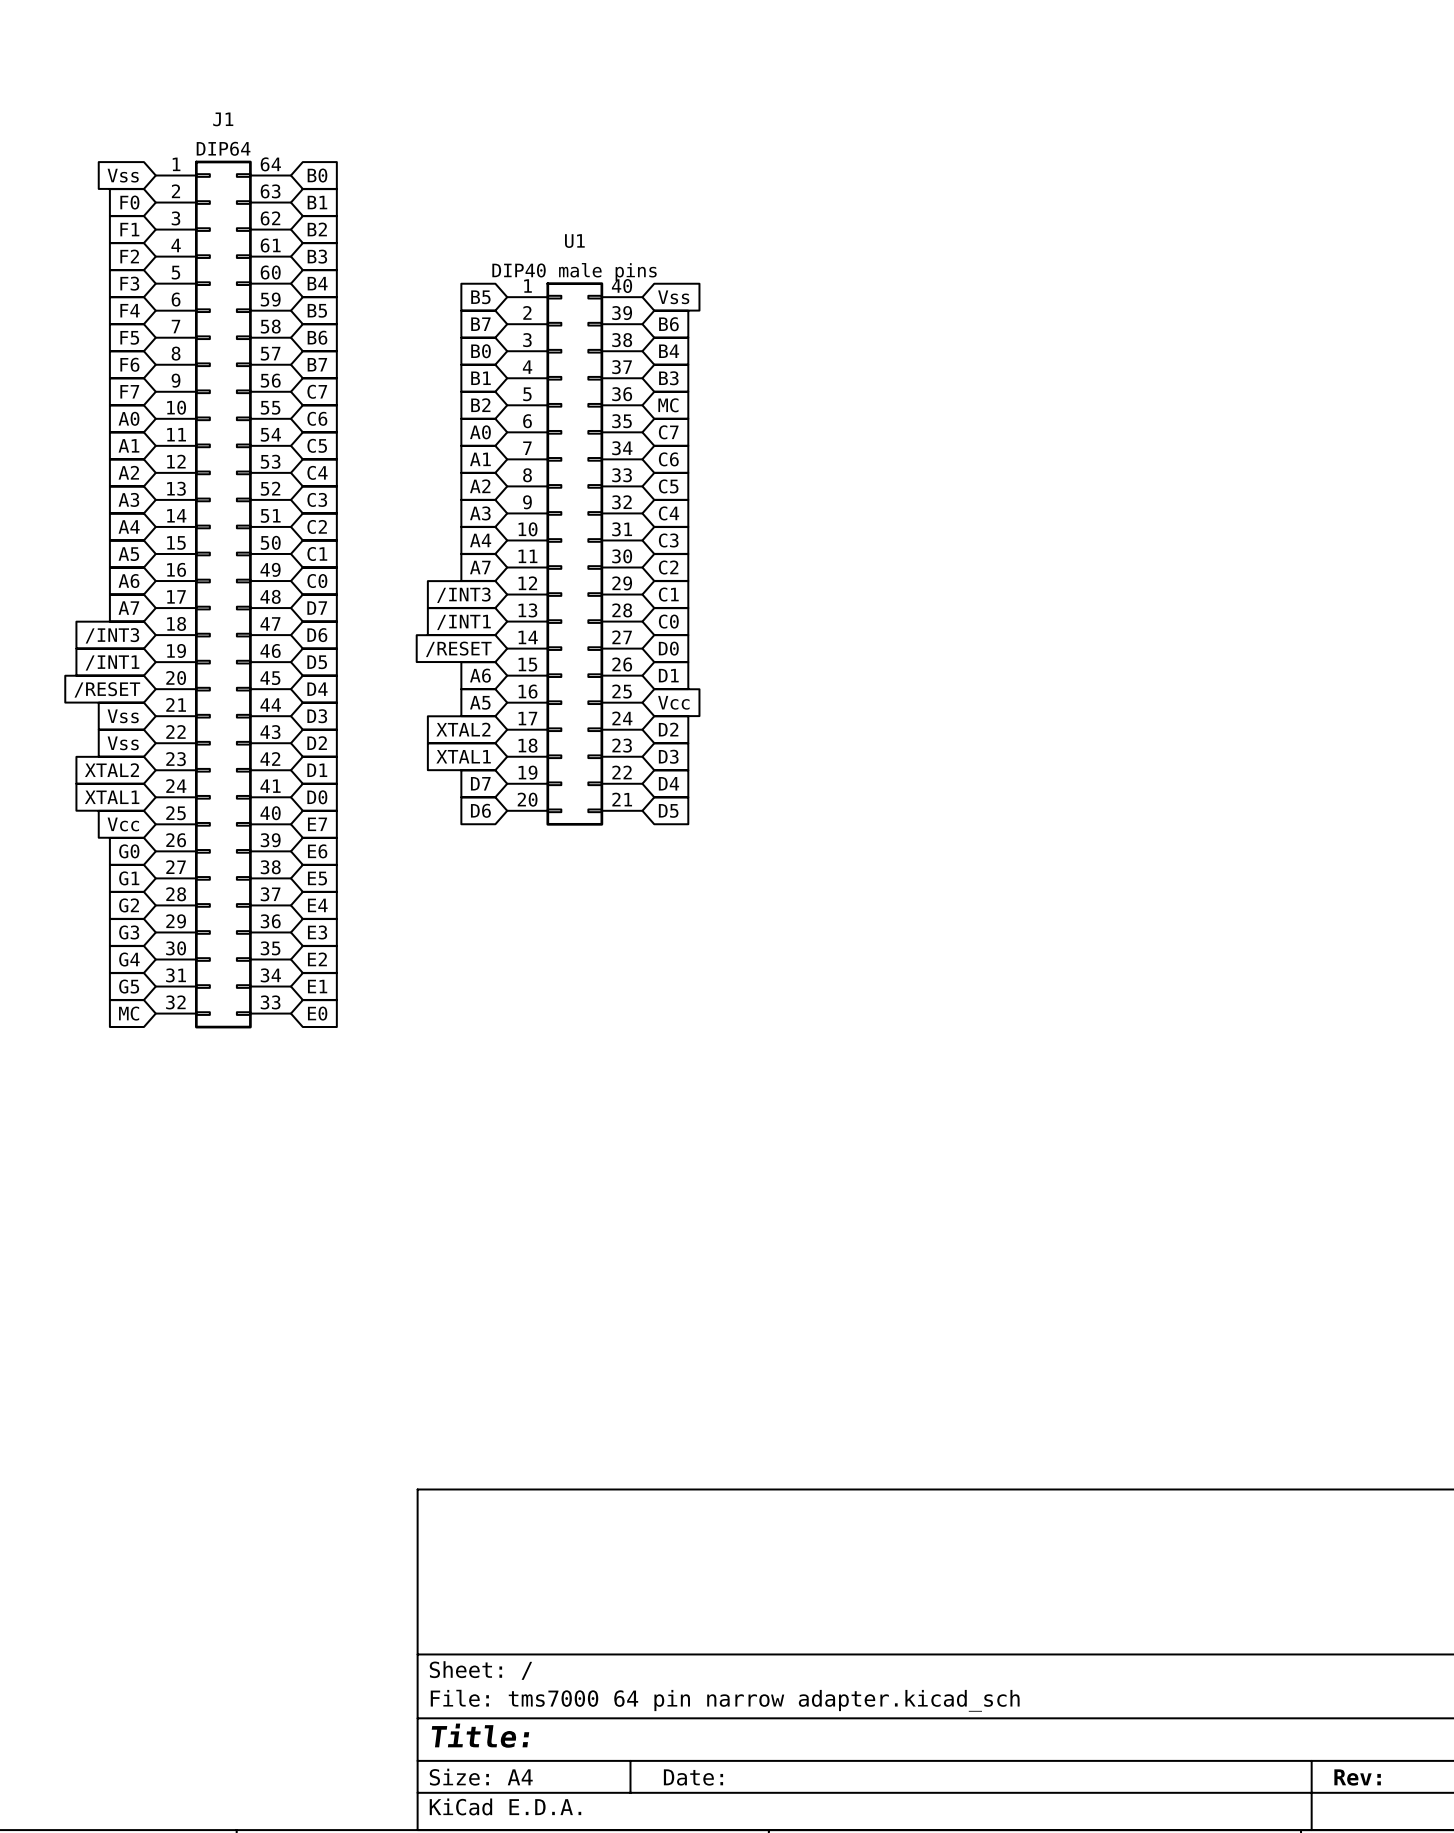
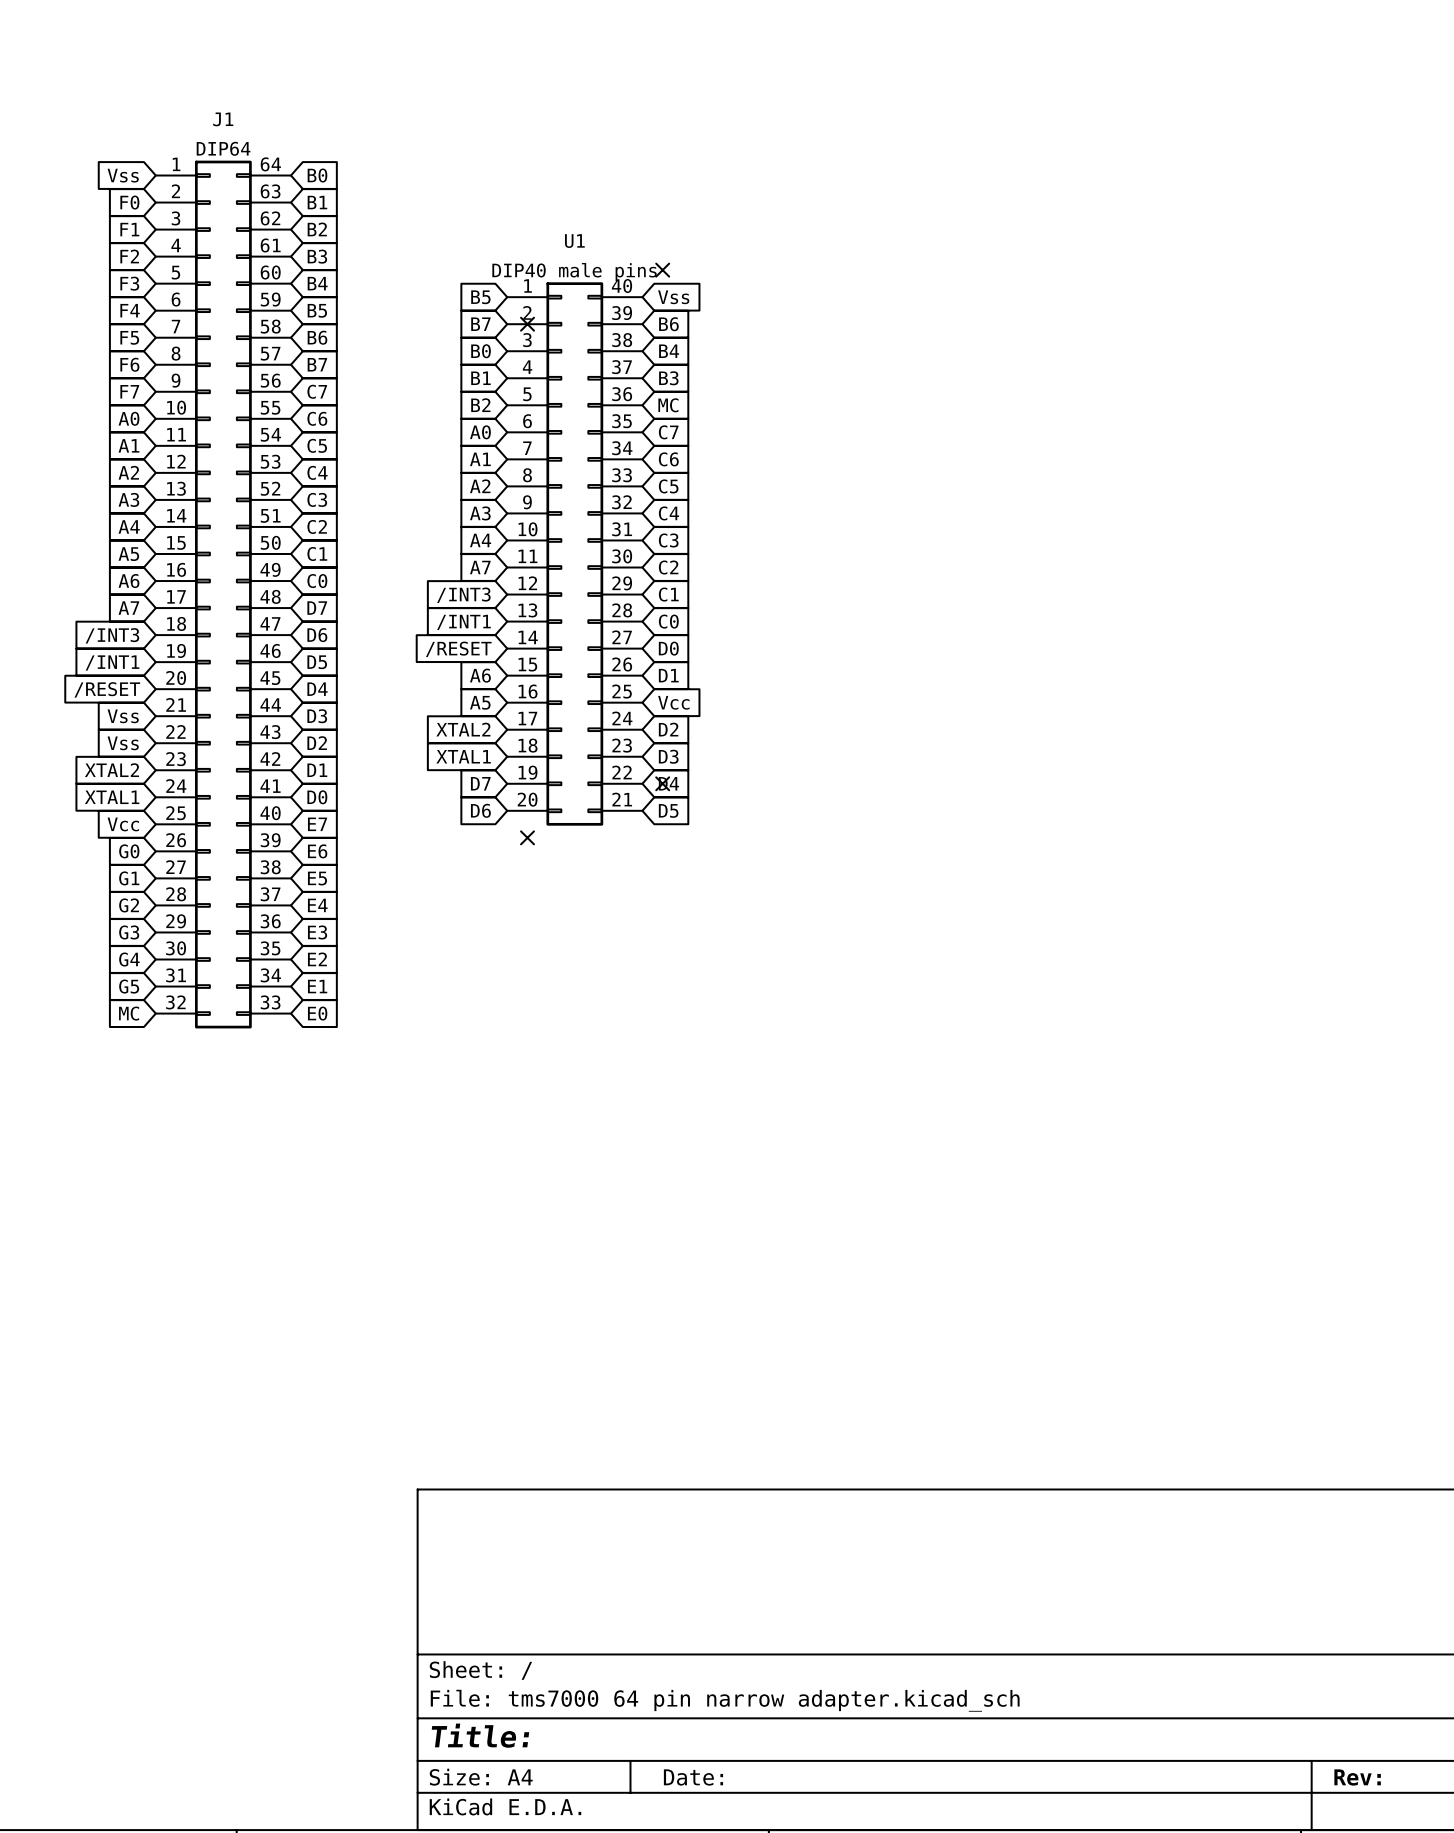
no-connect mark: none -> (662, 270)
no-connect mark: none -> (527, 324)
no-connect mark: none -> (662, 783)
no-connect mark: none -> (527, 837)

